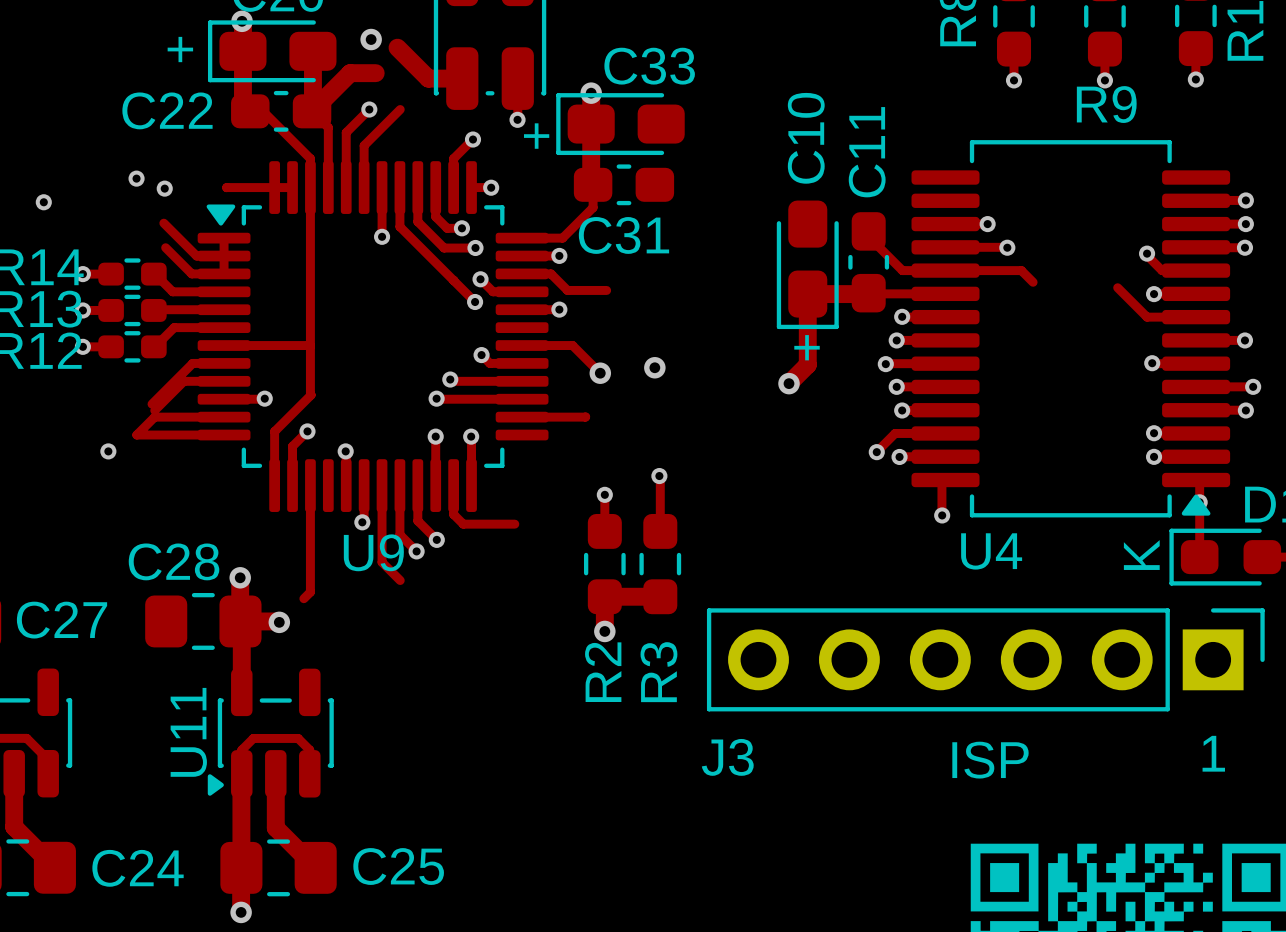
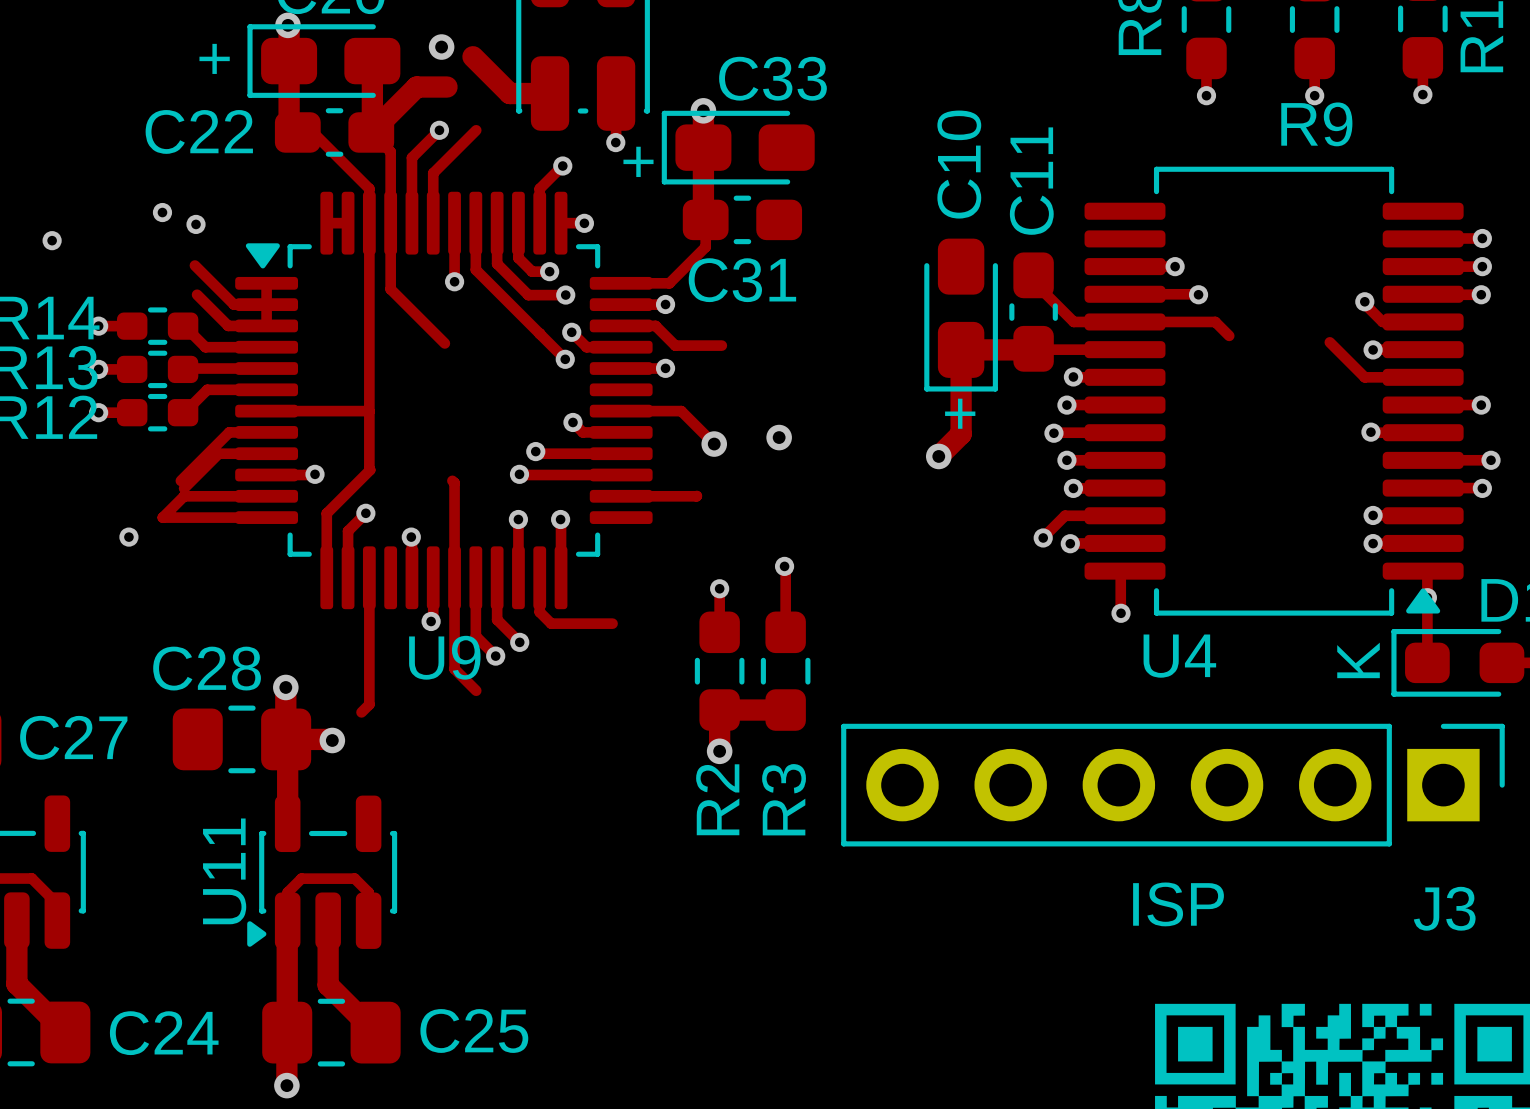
track: (226, 187) (274, 187) -> none
track: none -> (390, 223) (390, 289) (444, 343)
track: none -> (452, 480) (454, 482) (454, 577)
text: 1 (1213, 753) -> none
J3 name position: J3 (727, 757) -> J3 (1444, 908)

